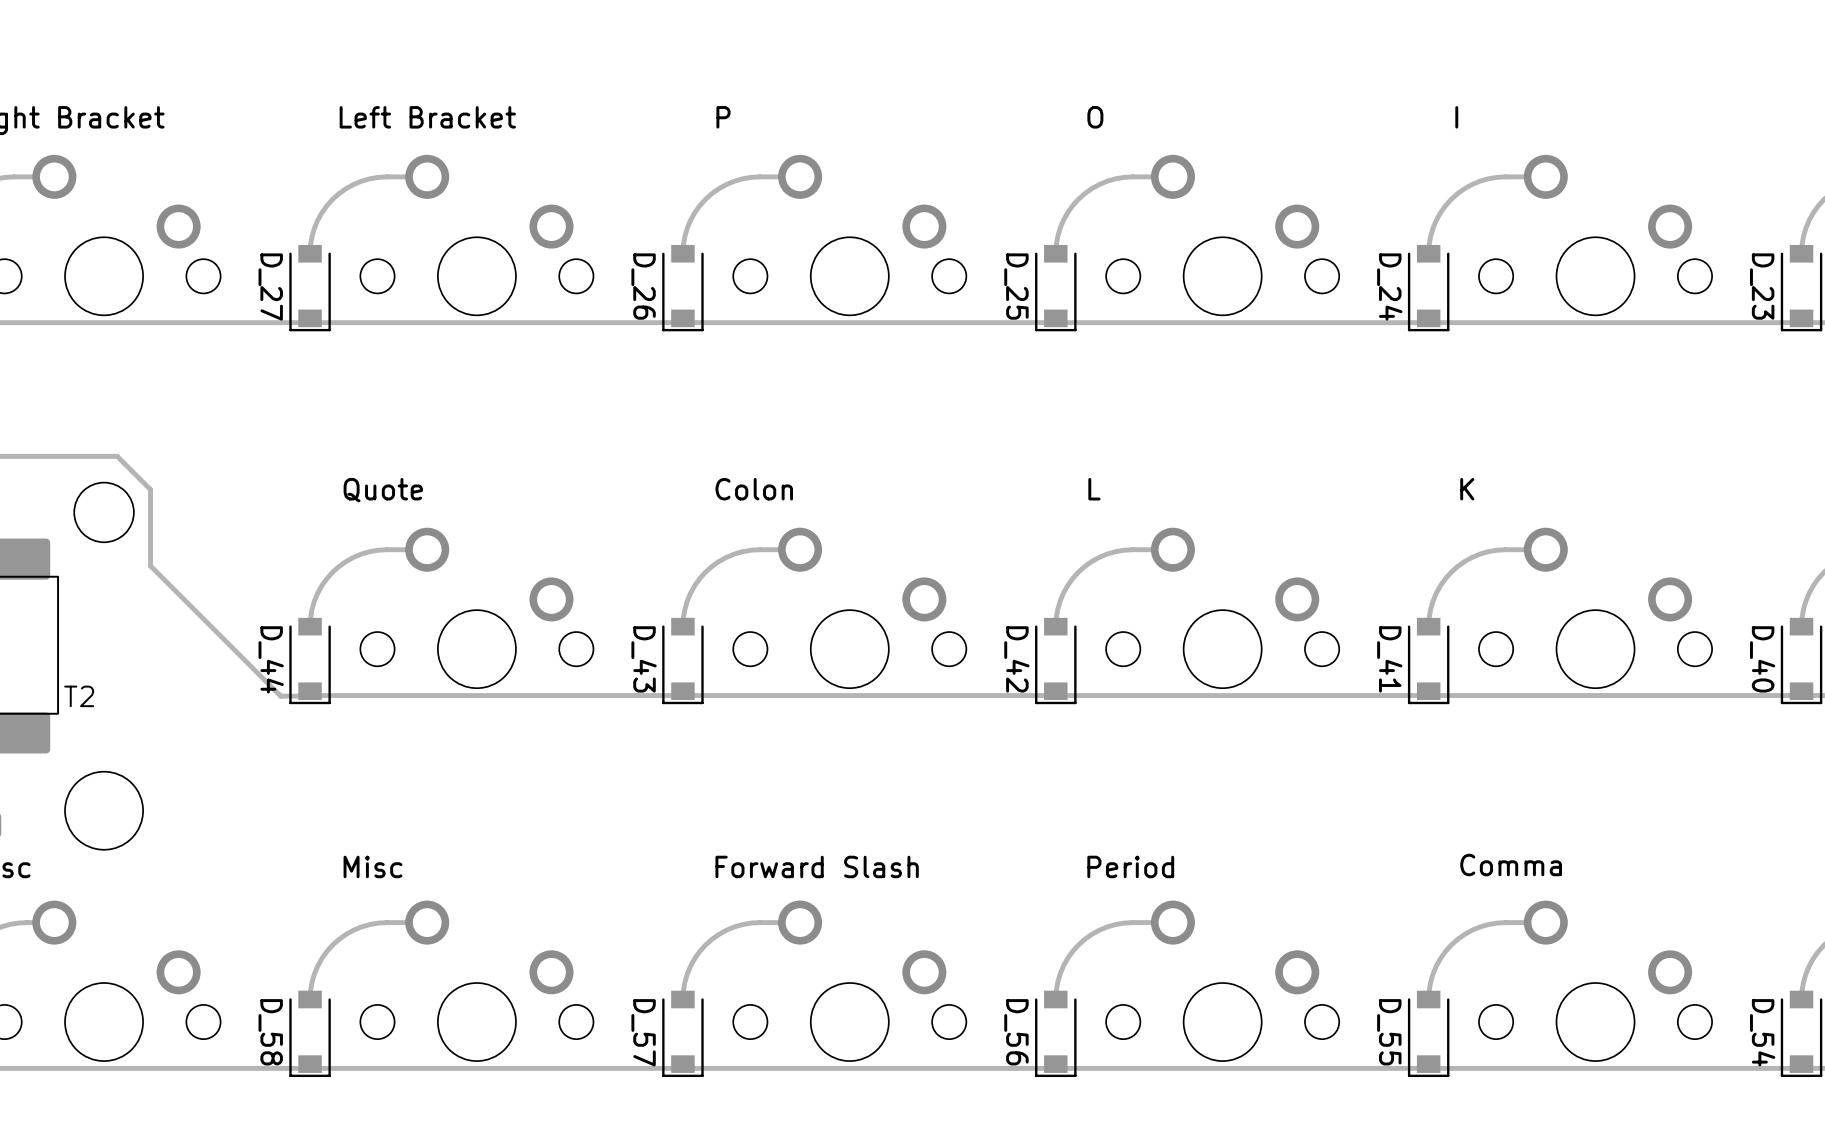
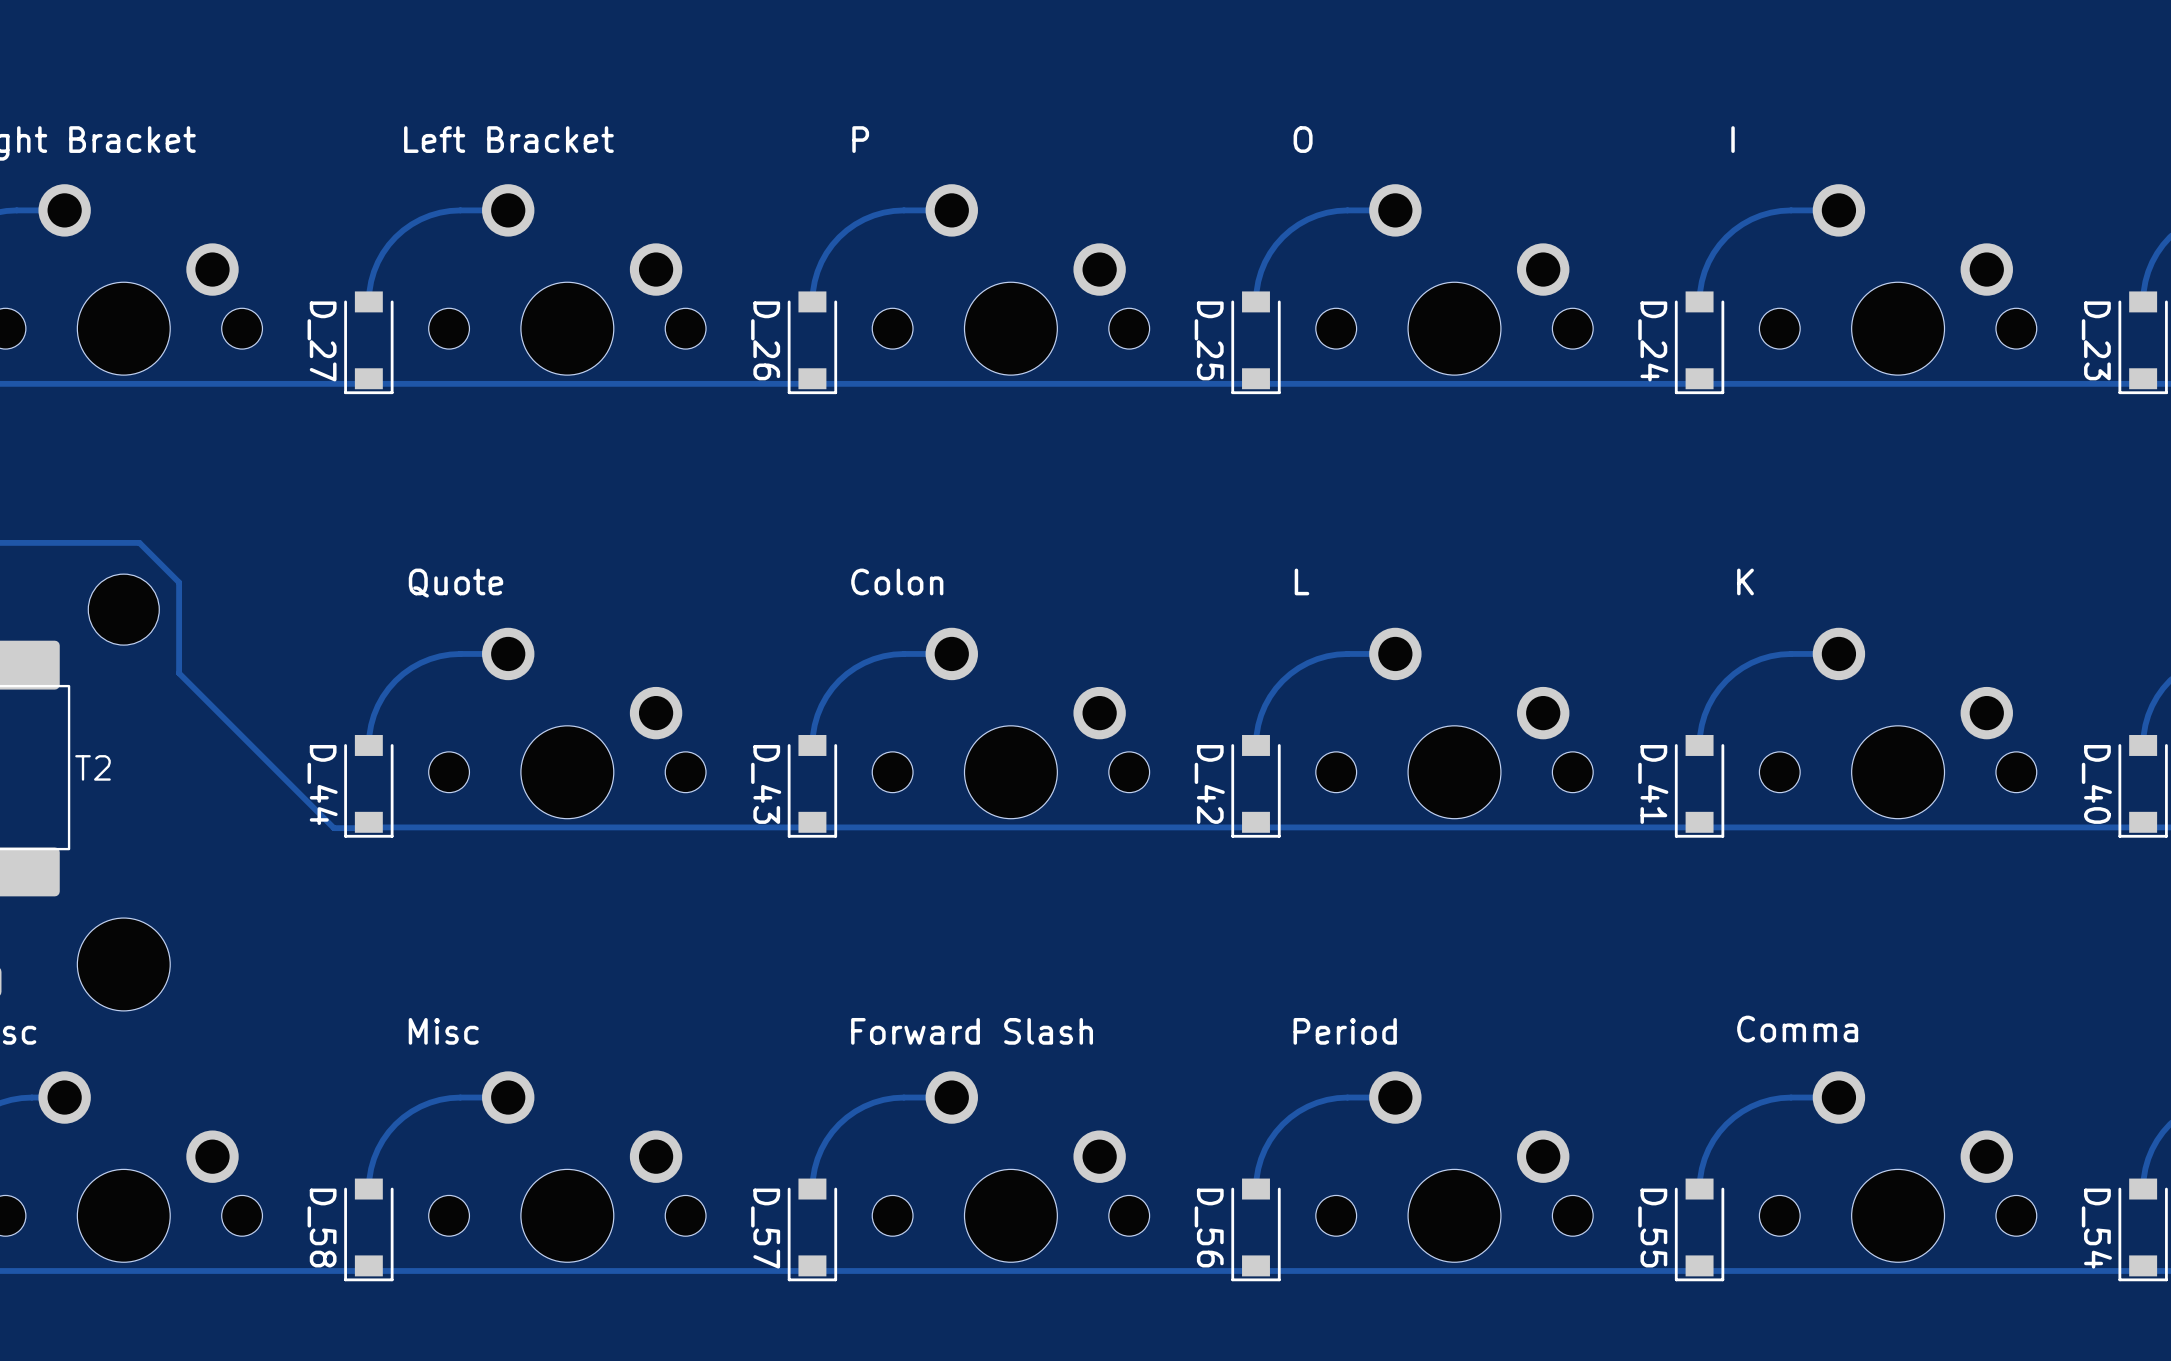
T2 name position: T2 (79, 696) -> T2 (92, 767)

